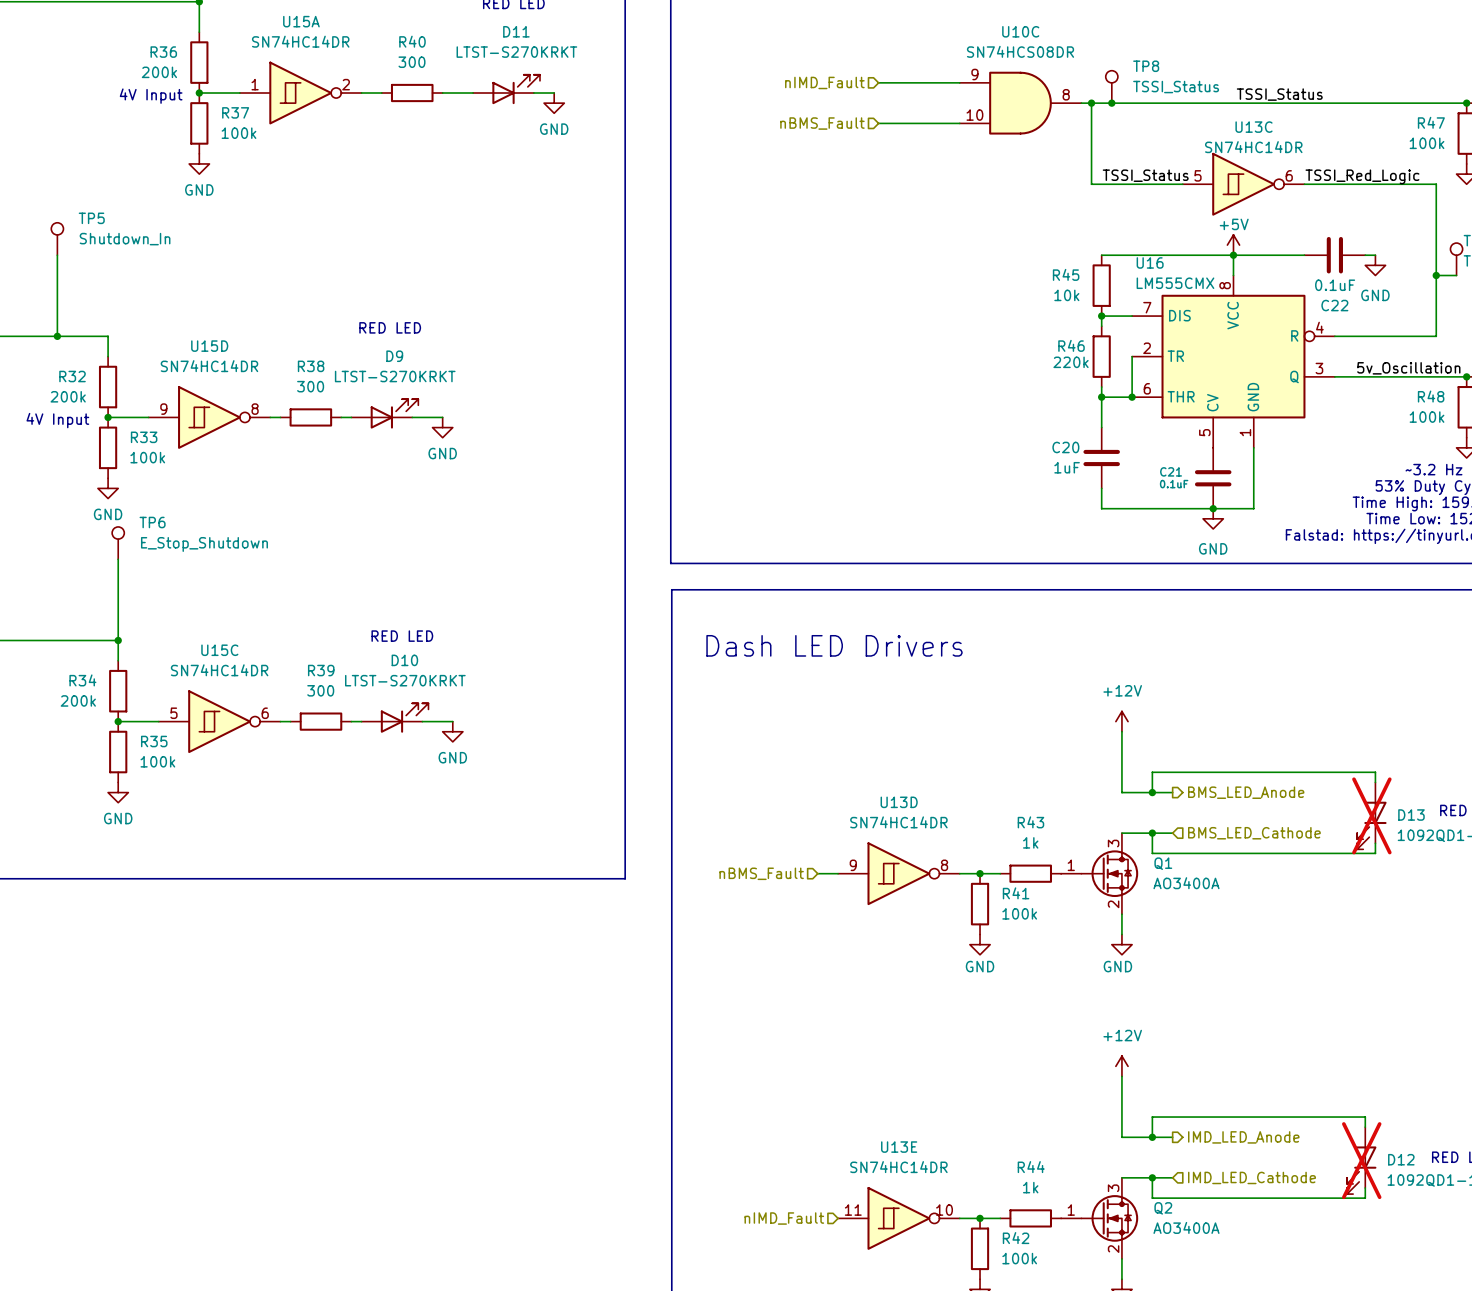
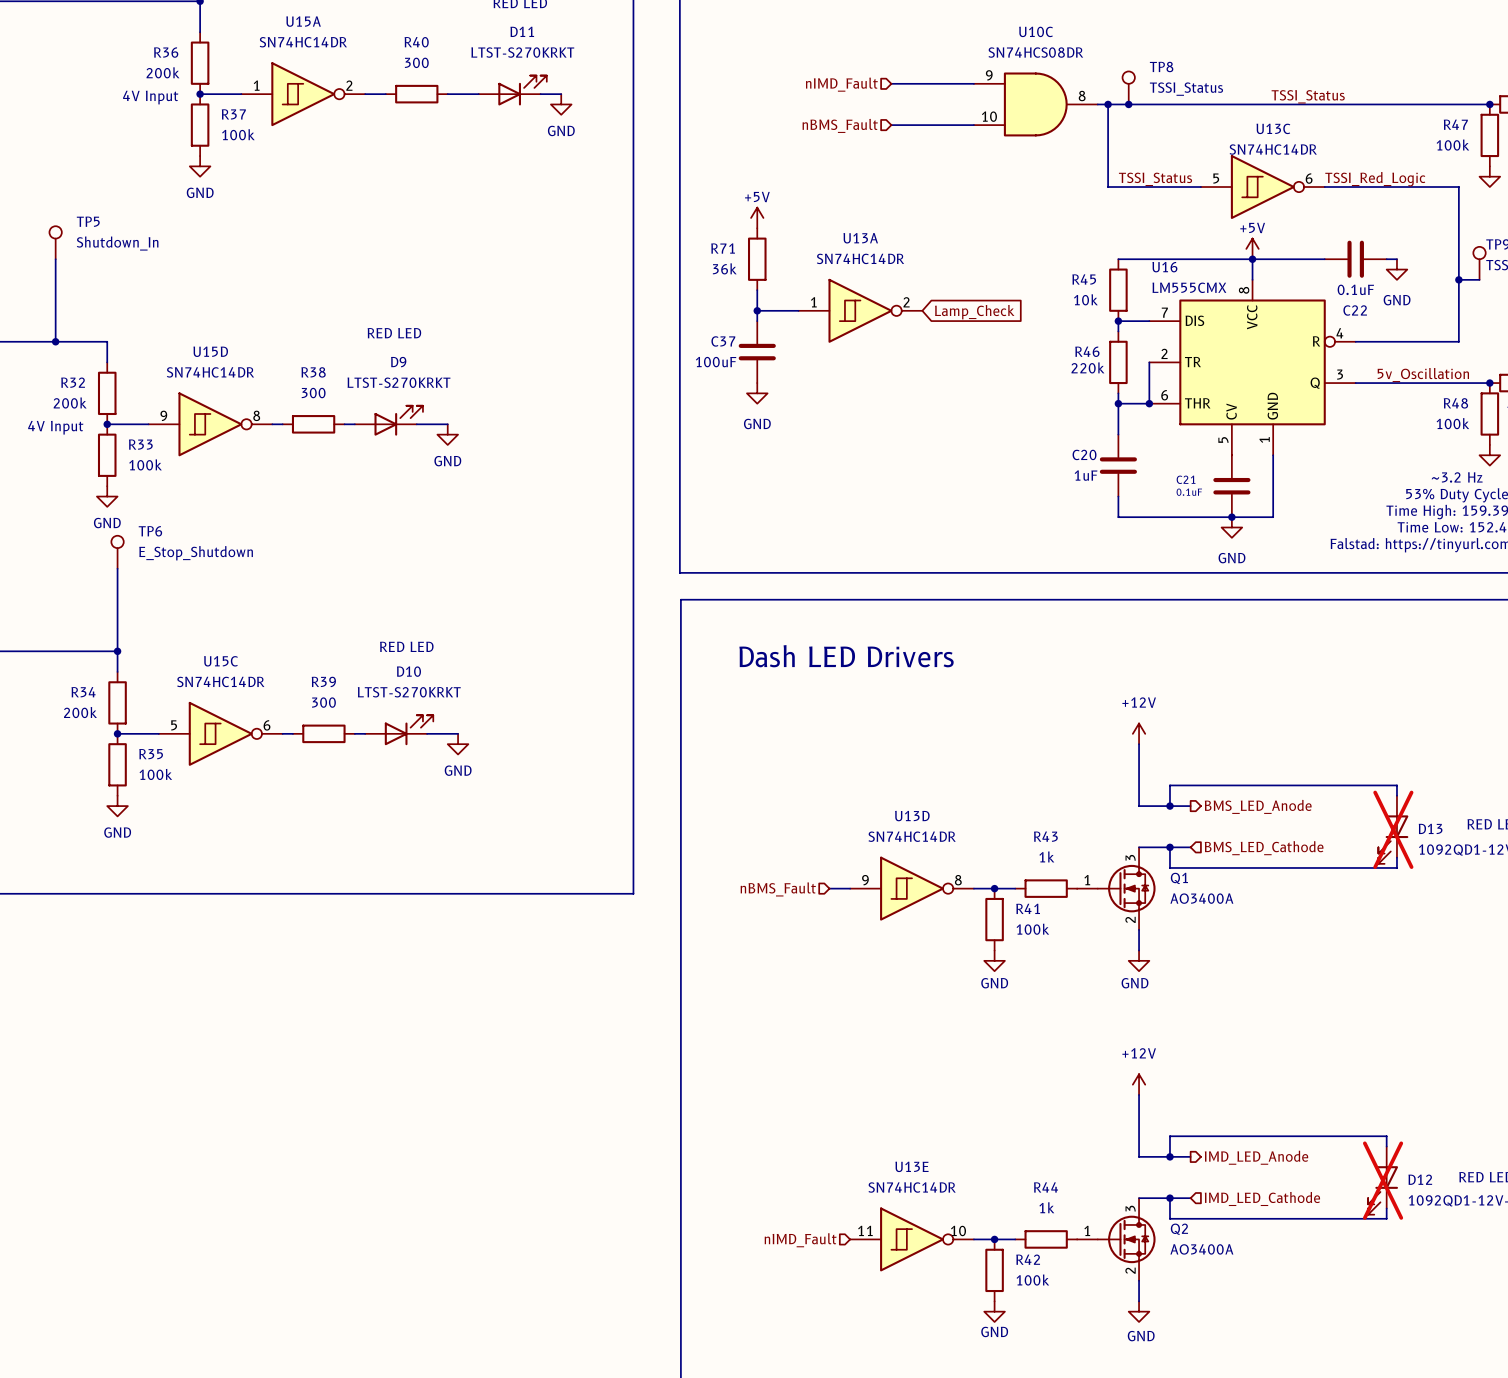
power symbol: none -> +5V (757, 217)
R71: none -> 36k (757, 259)
wire: none -> (757, 290) (757, 321)
wire: none -> (757, 310) (798, 310)
junction: none -> (757, 310)
U13A: none -> SN74HC14DR (860, 310)
global label: none -> Lamp_Check (974, 312)
C37: none -> 100uF (757, 352)
power symbol: none -> GND (757, 393)

